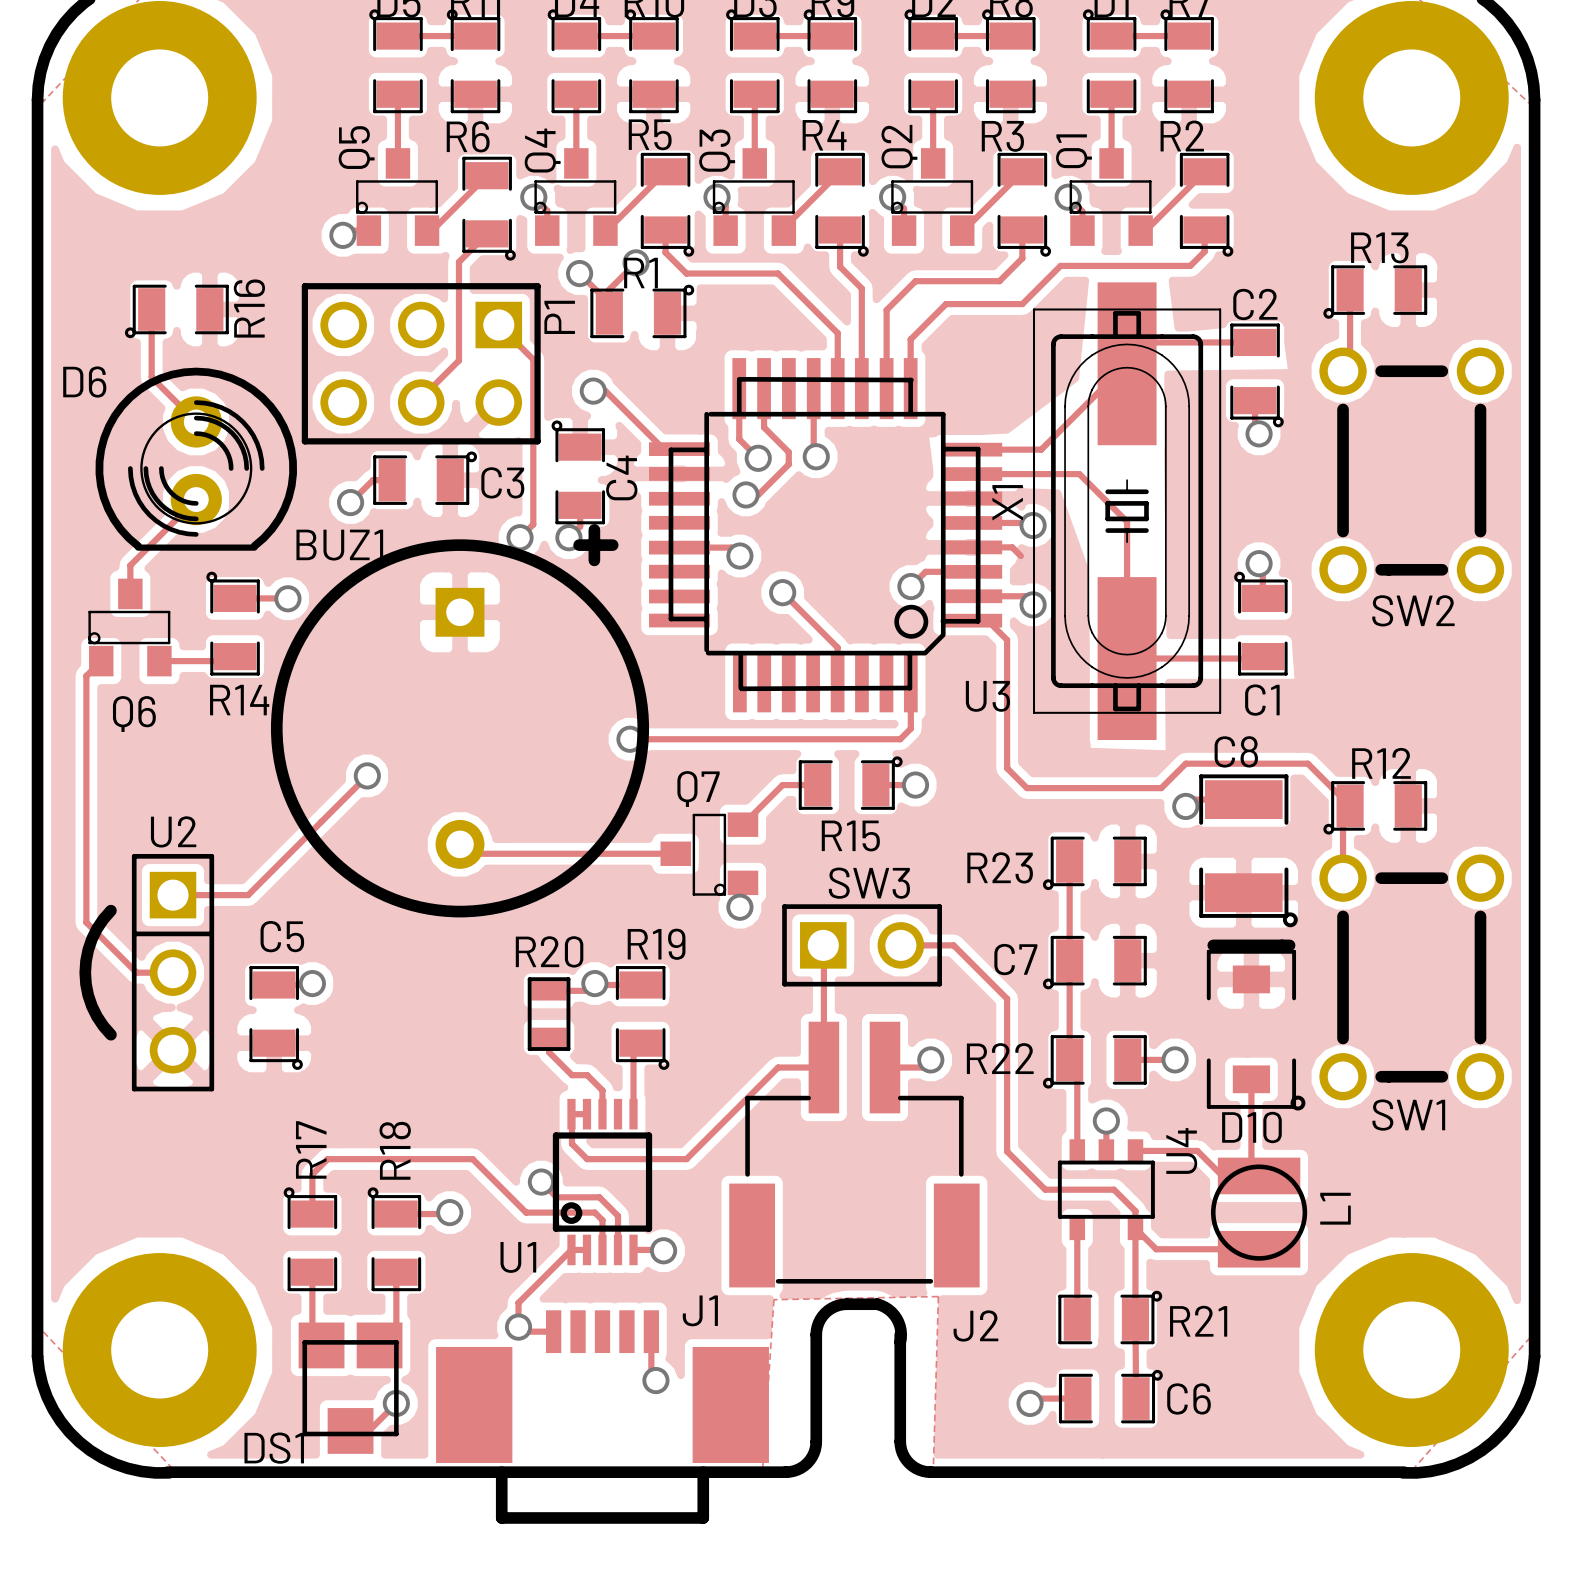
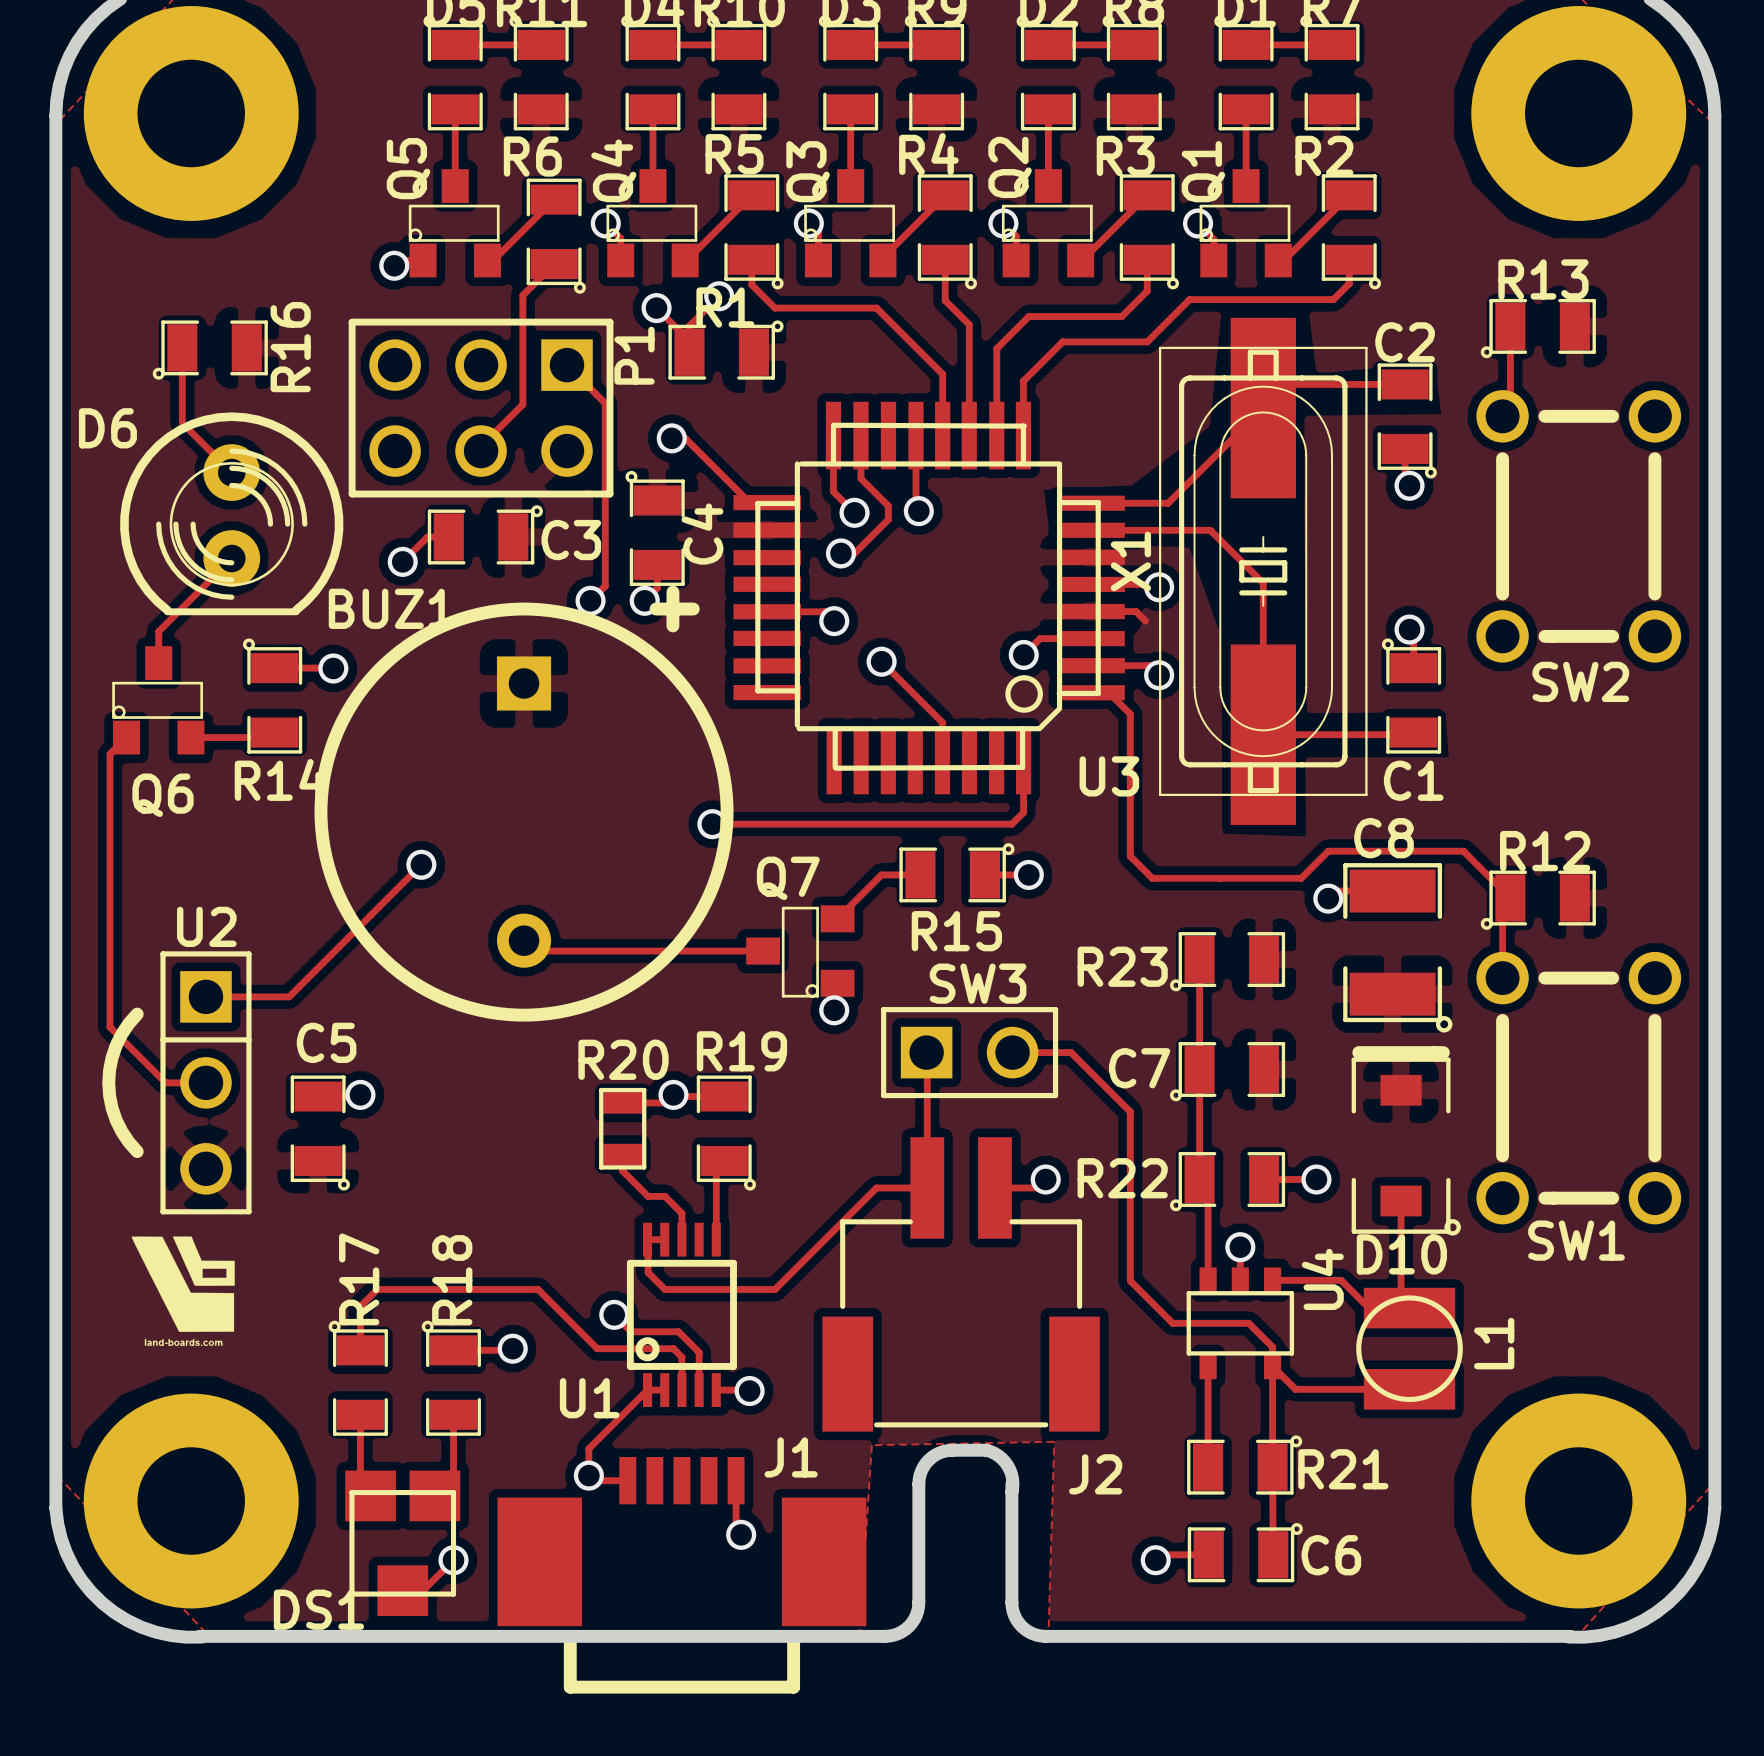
drawing: none -> [131, 1236, 235, 1347]

